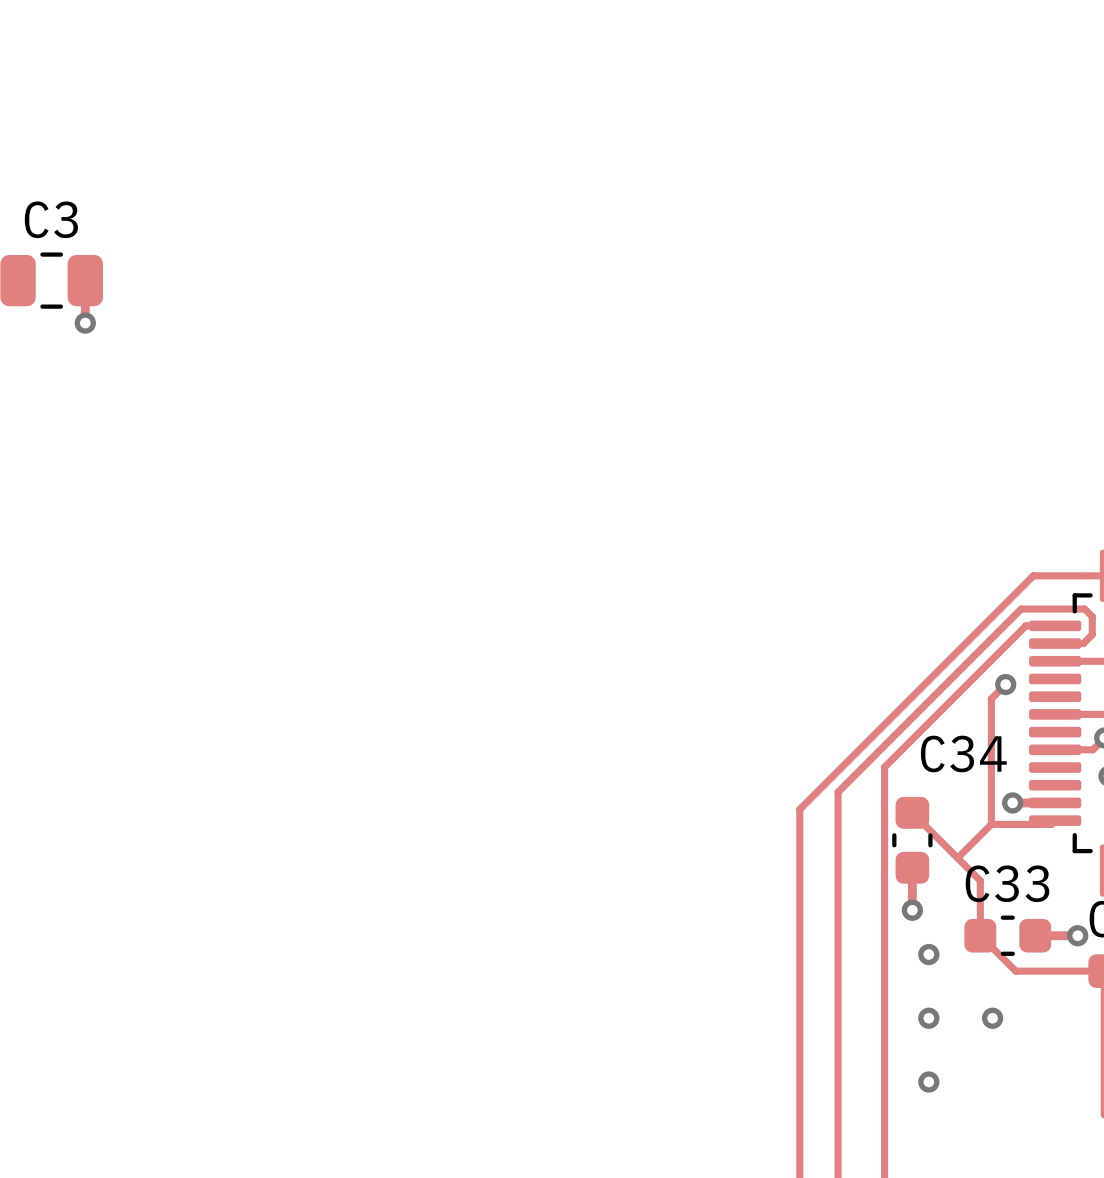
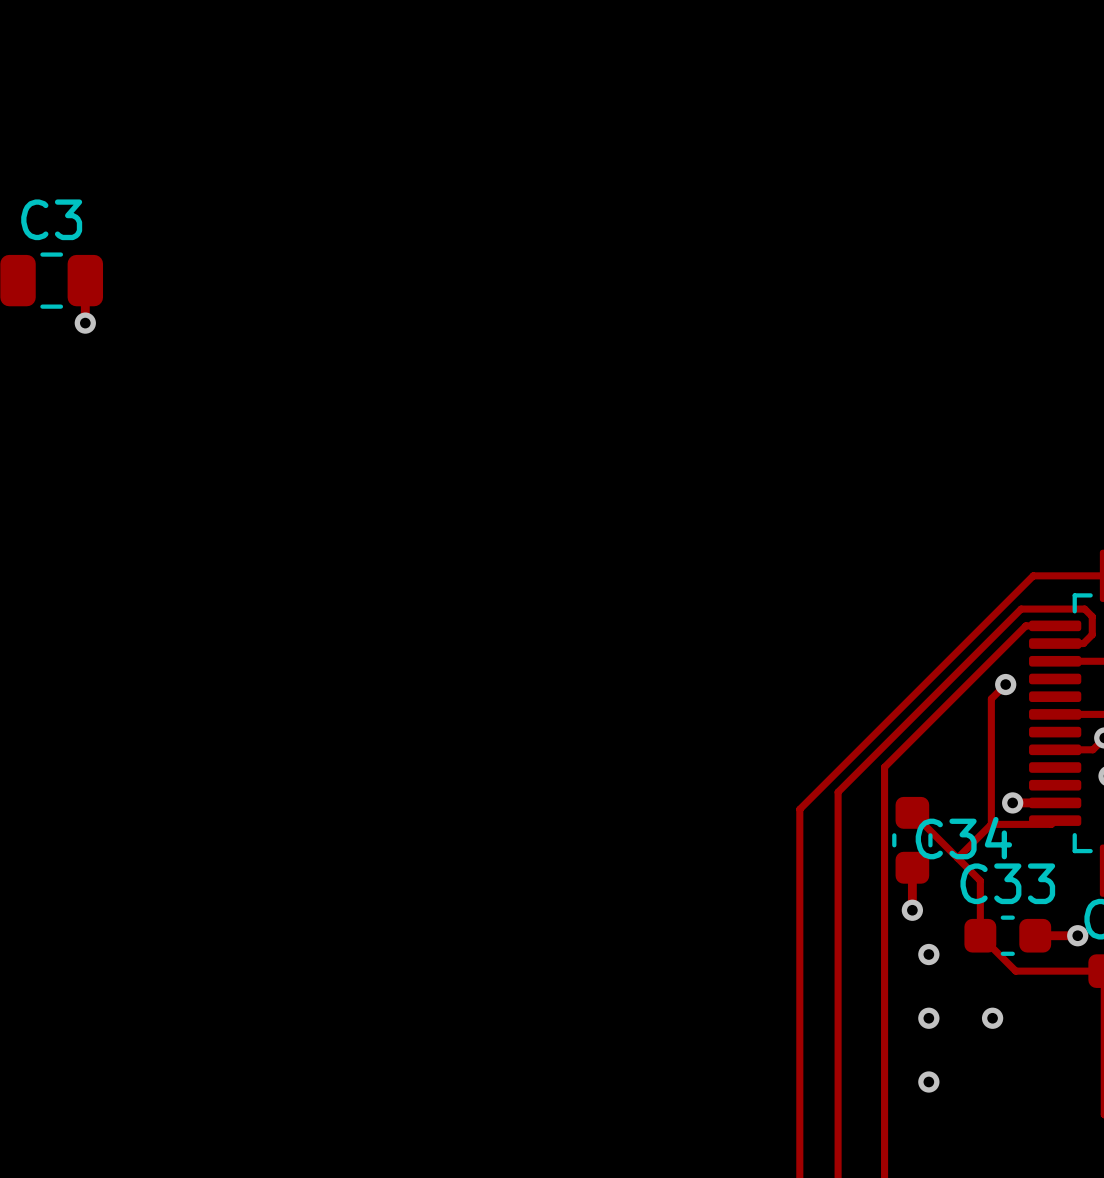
C34 name position: C34 (963, 753) -> C34 (963, 838)

